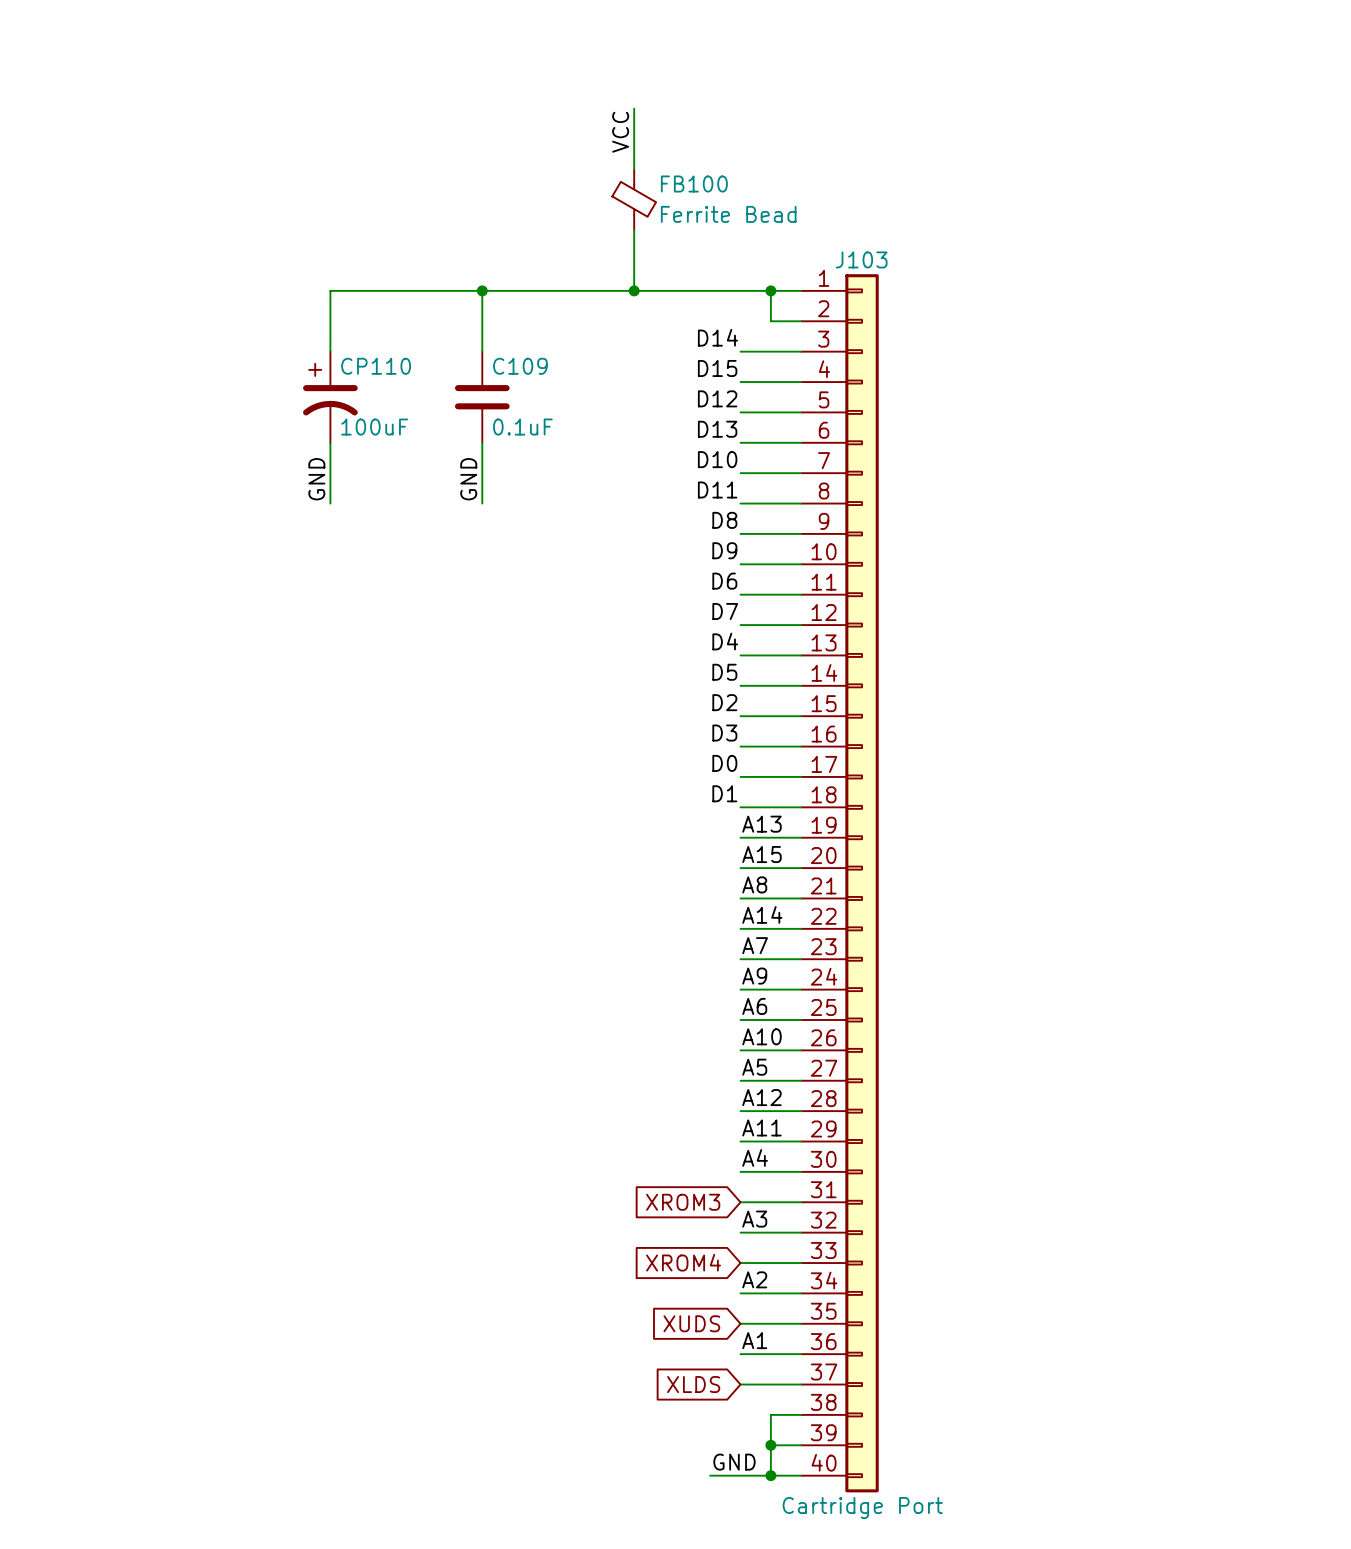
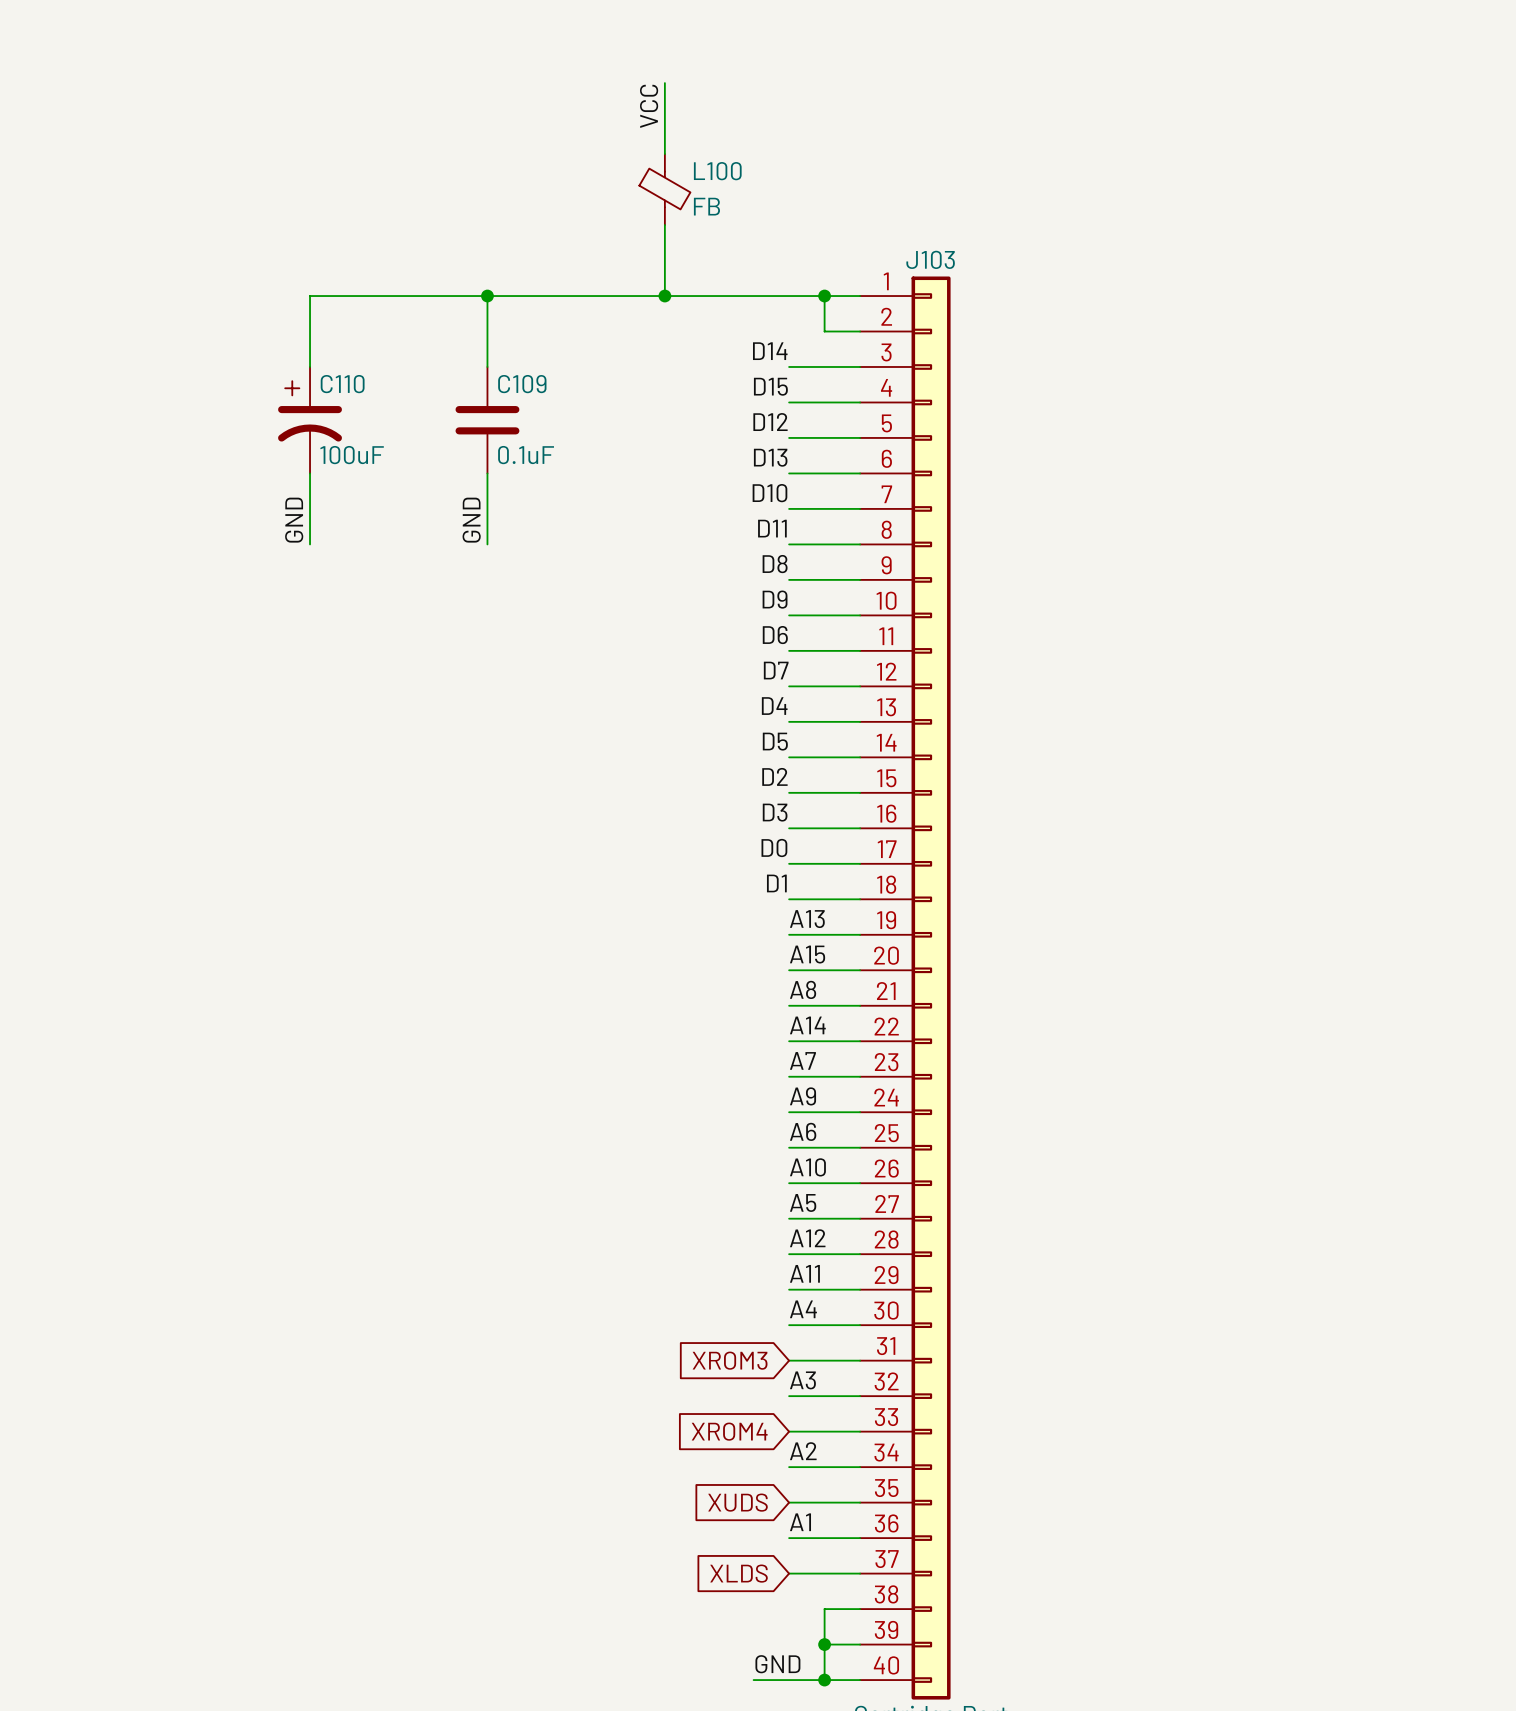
FB100 name: FB100 (694, 184) -> L100 (717, 171)
FB100 value: Ferrite Bead (728, 214) -> FB (706, 206)
CP110 name: CP110 (376, 366) -> C110 (342, 384)

